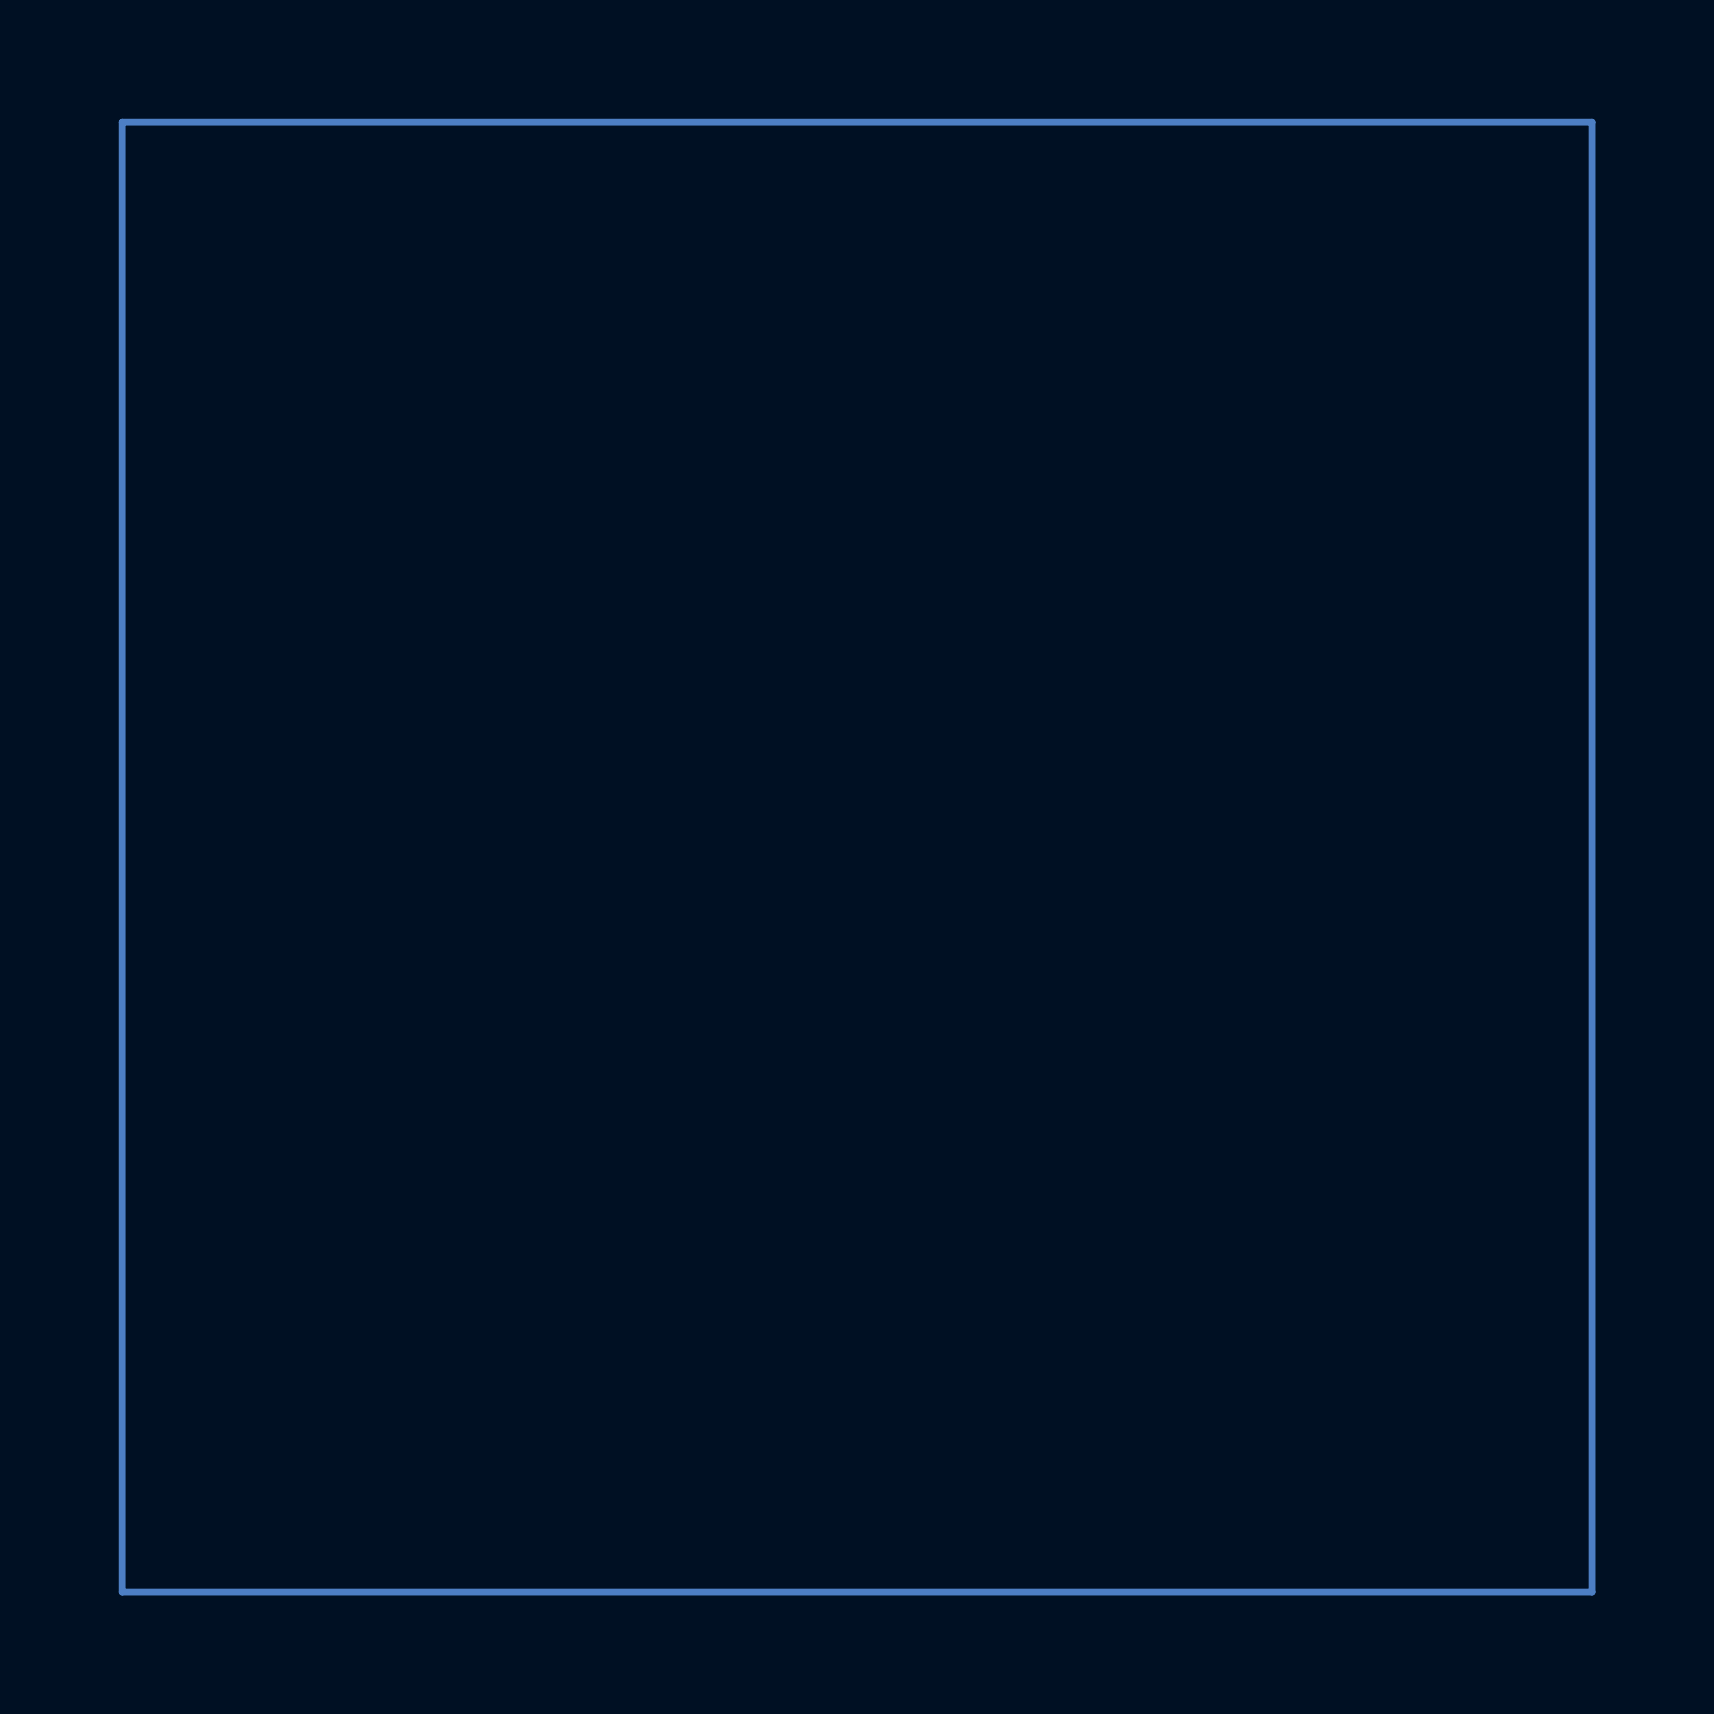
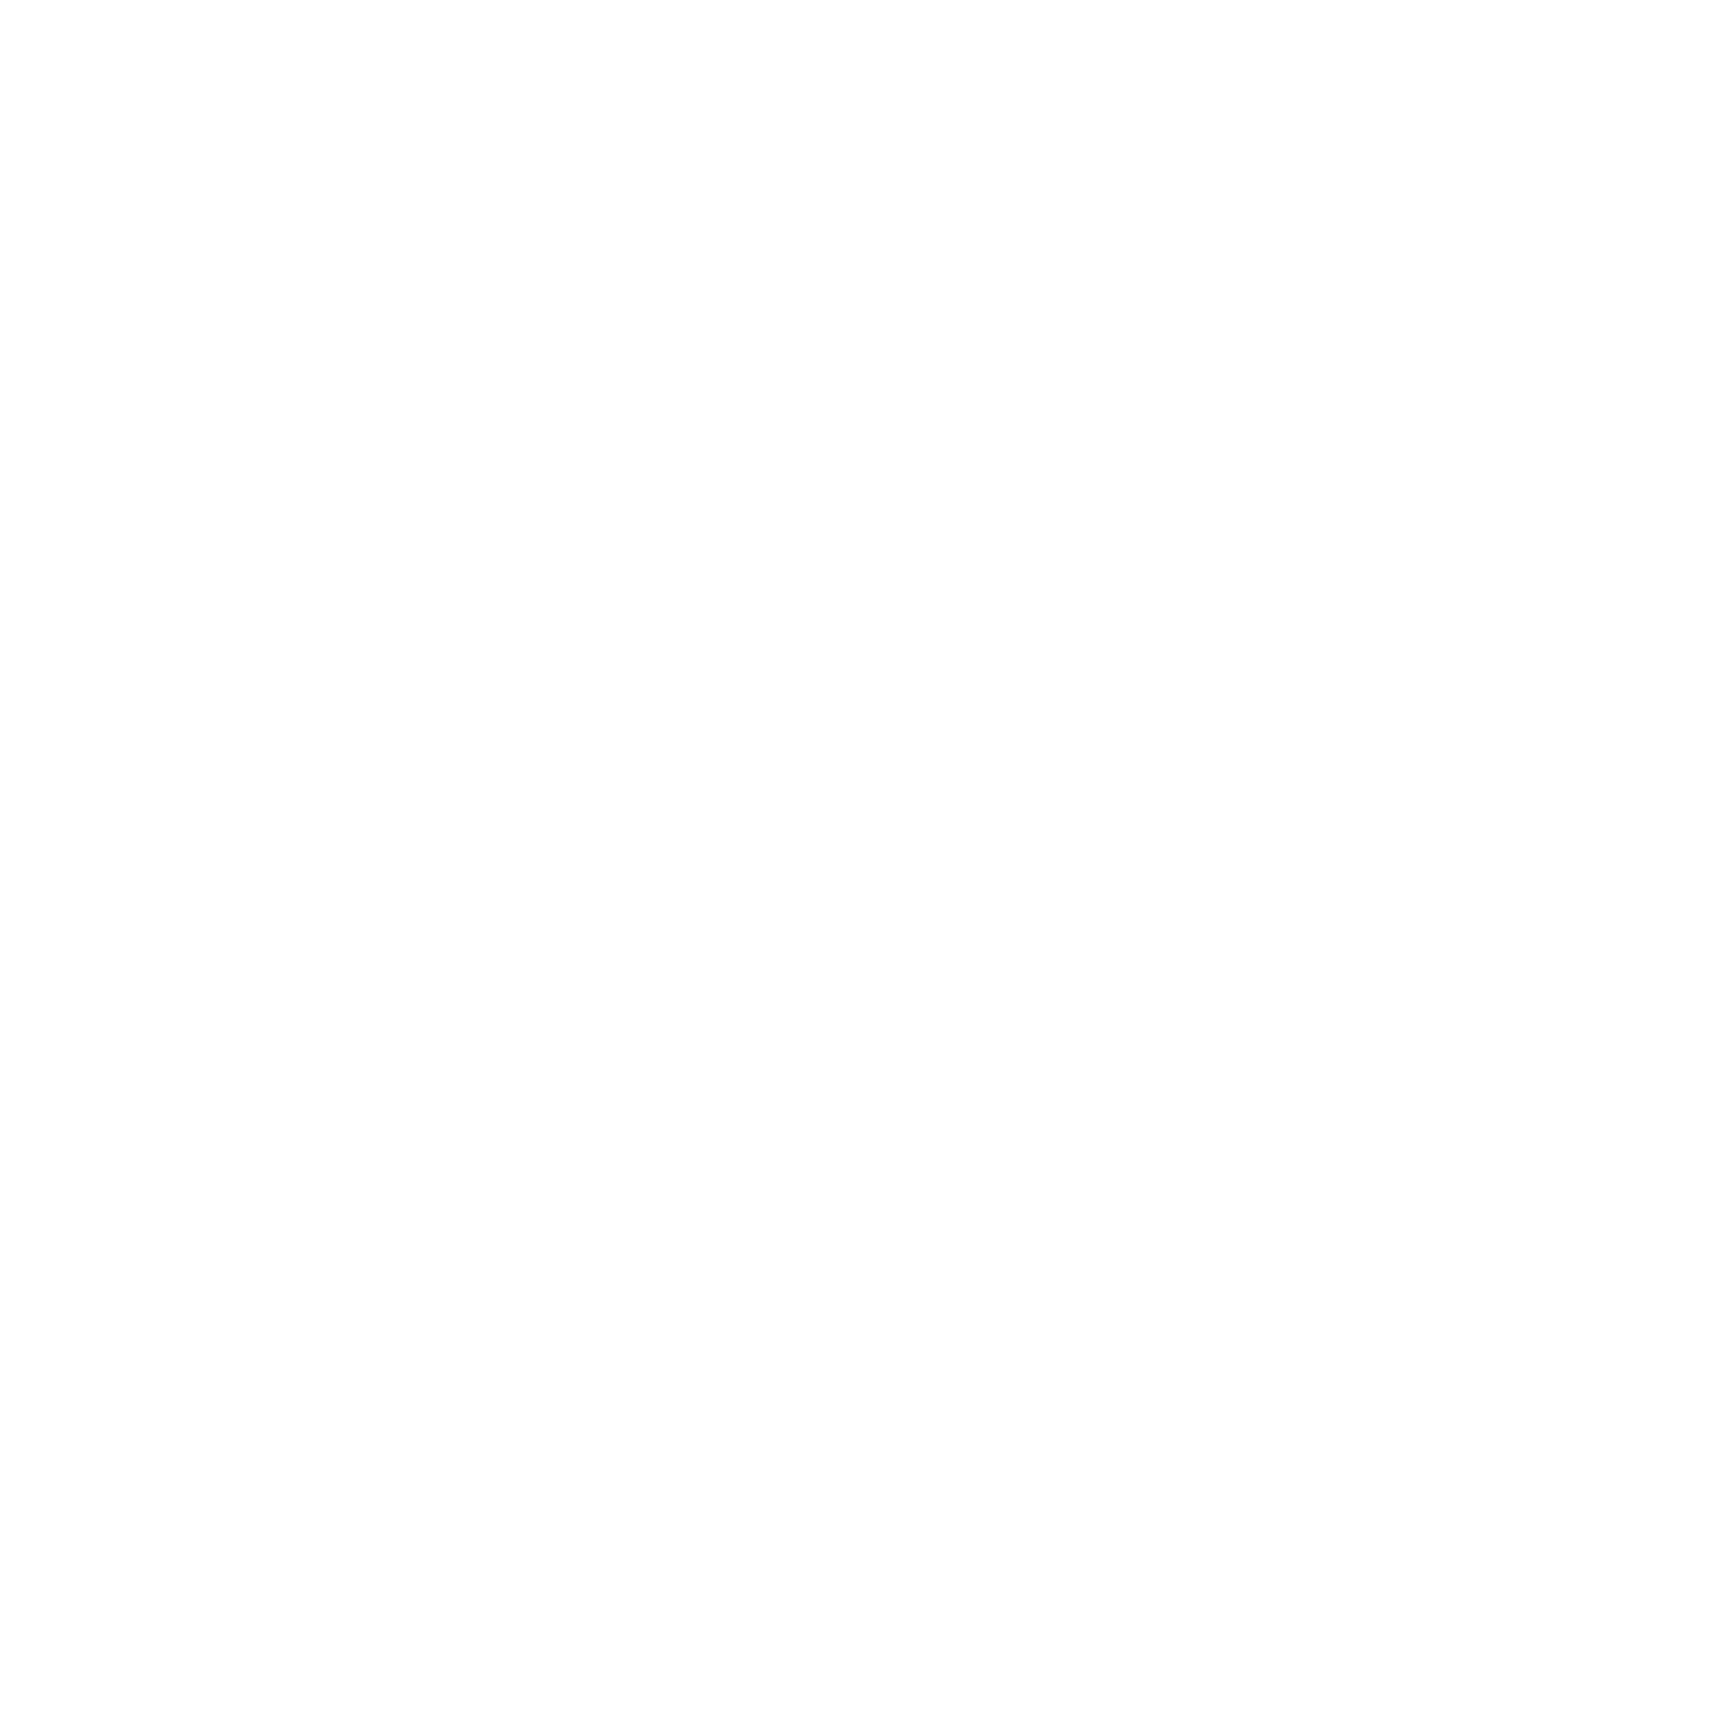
bottom track: (122, 122) (1592, 122) (1592, 1592) (122, 1592) (122, 122) -> none

